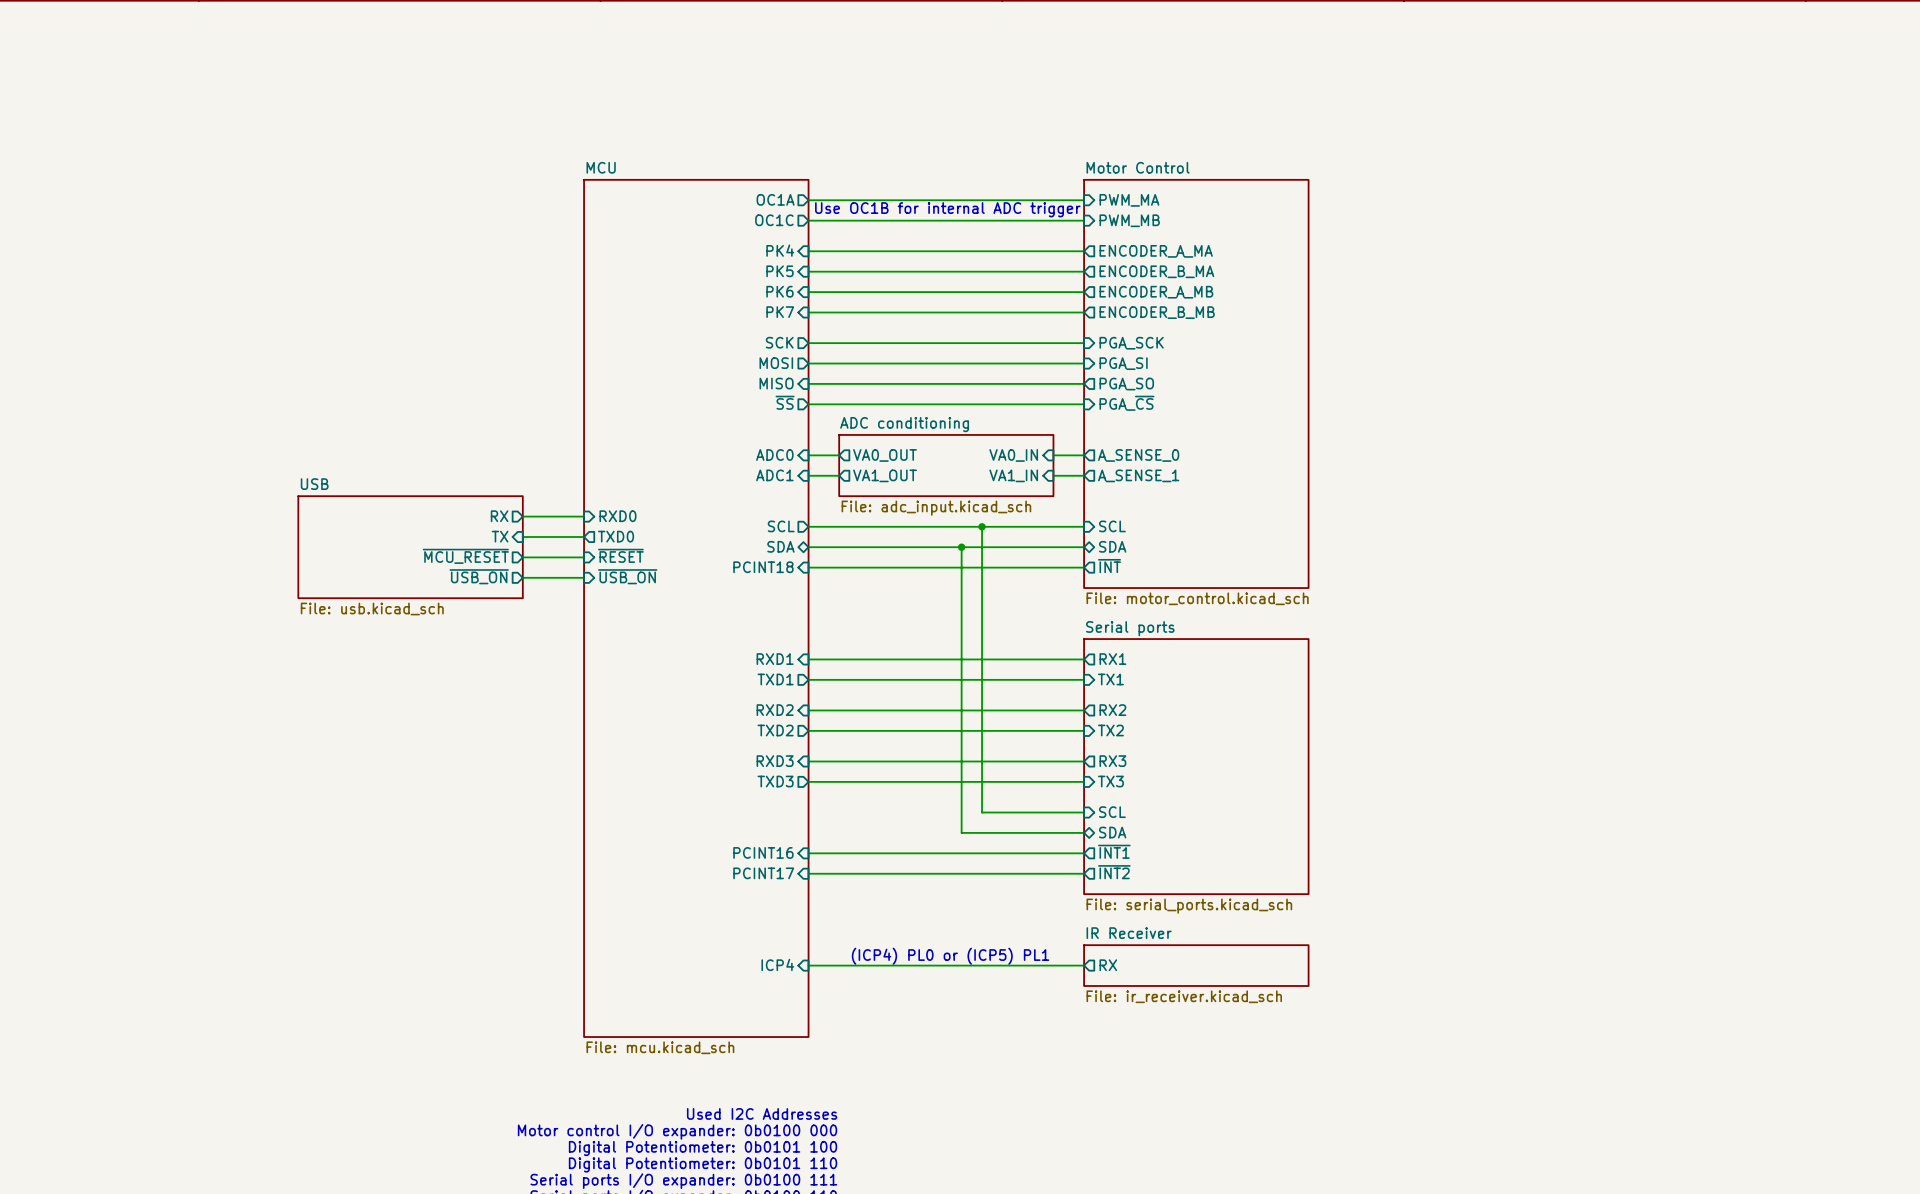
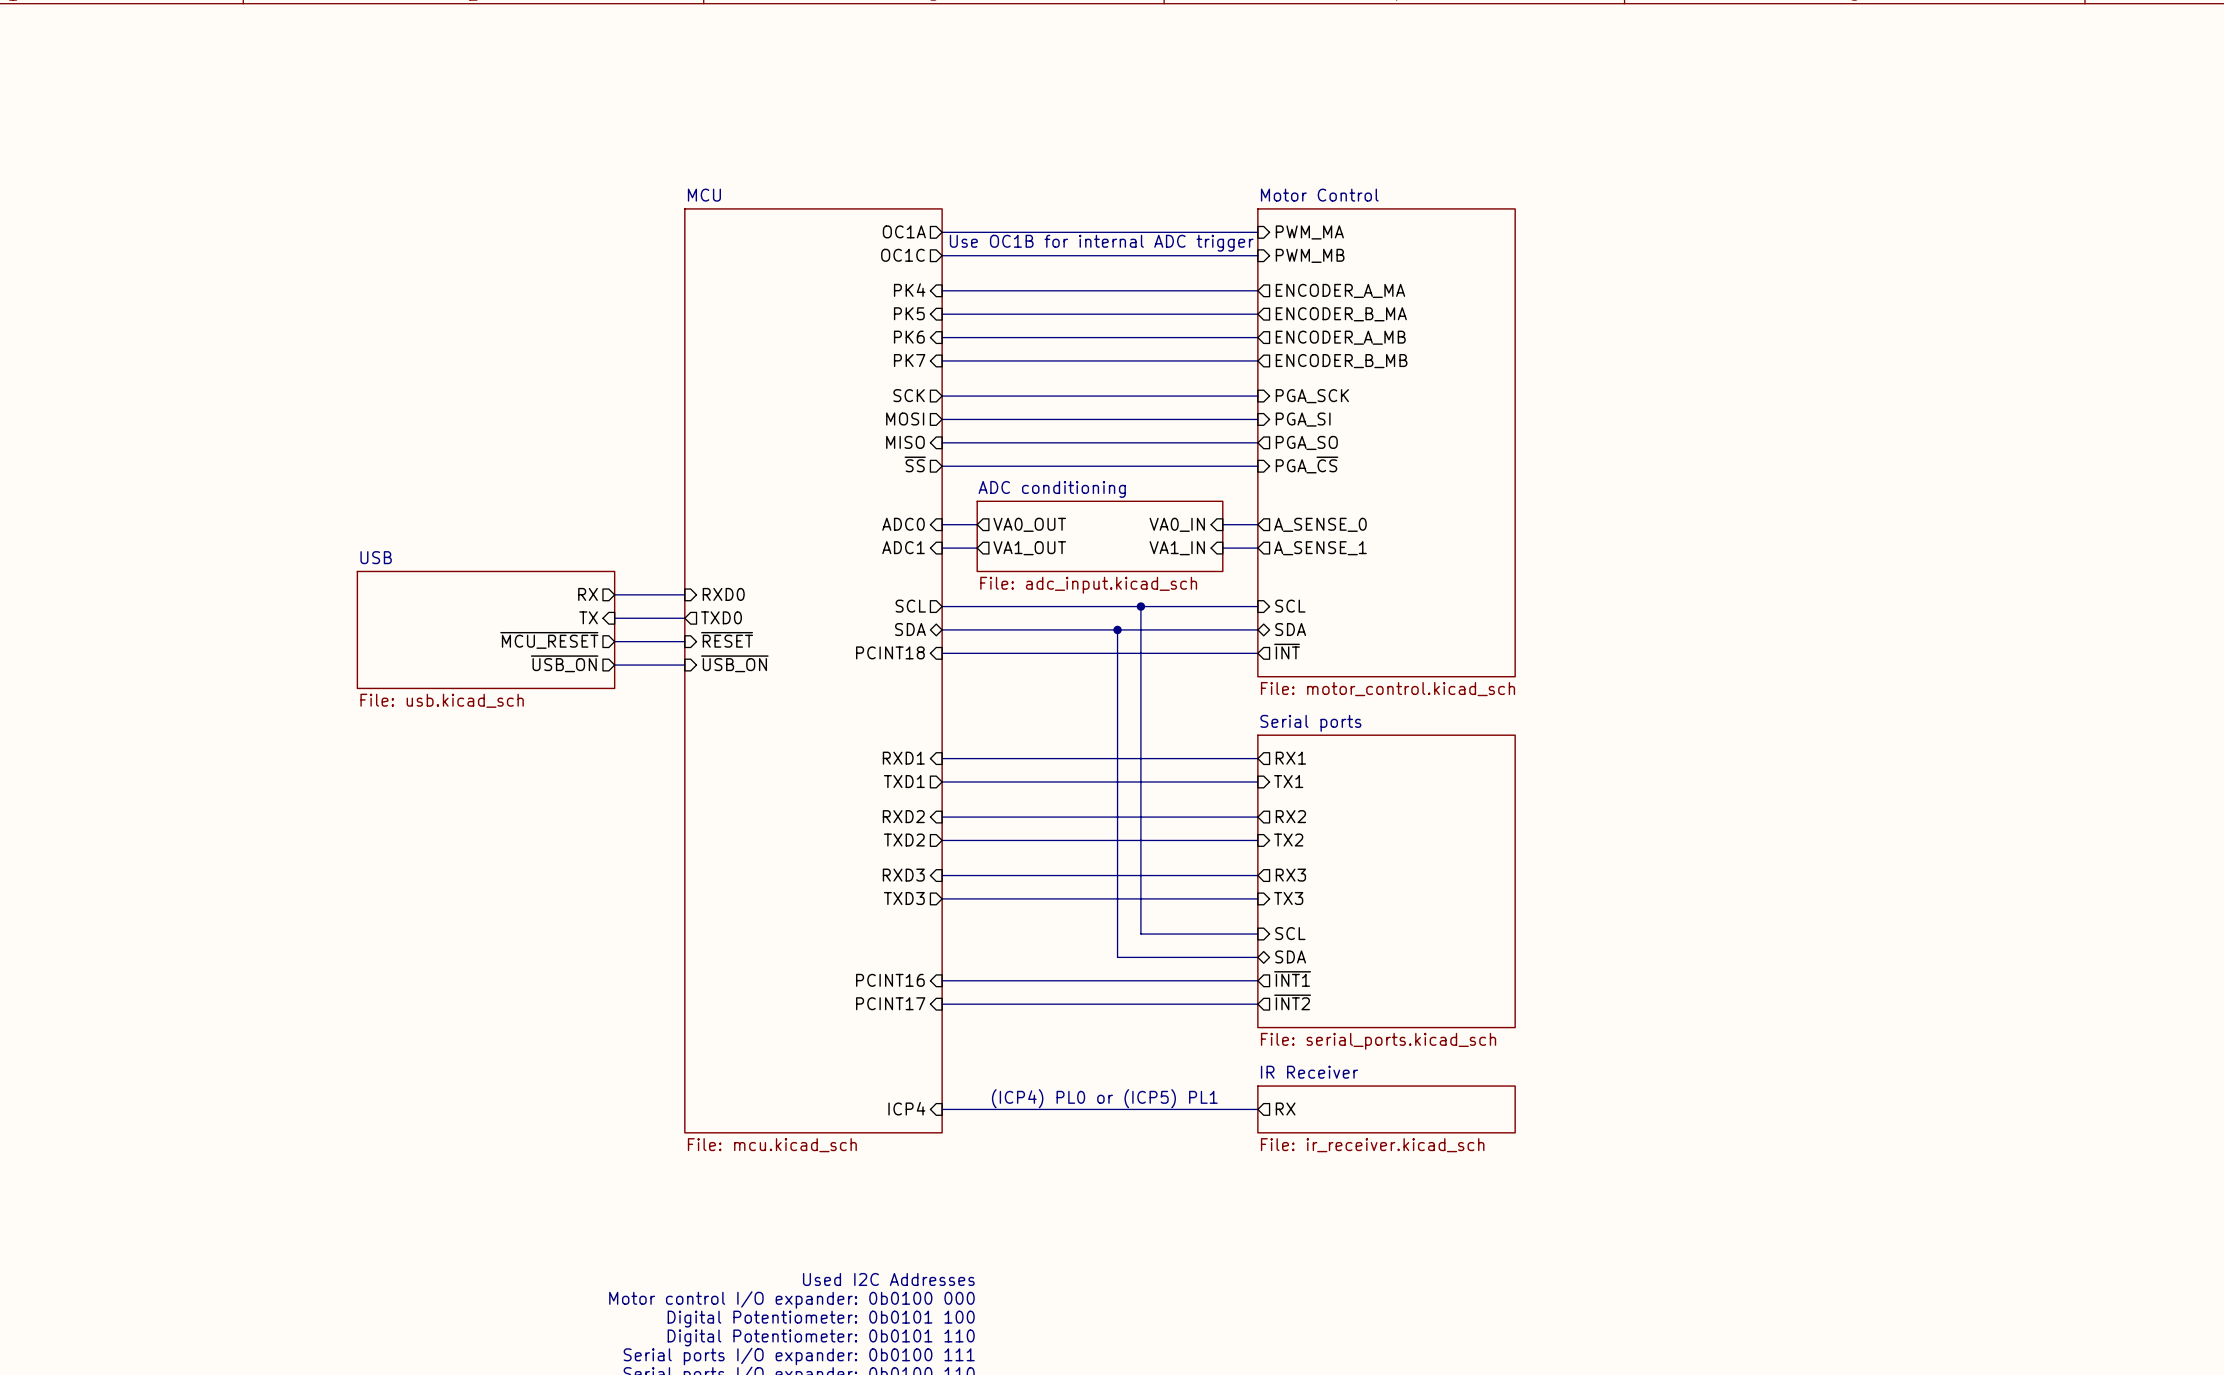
sheet MCU: none -> File: mcu.kicad_sch (813, 670)
sheet MCU: File: mcu.kicad_sch (696, 608) -> none

